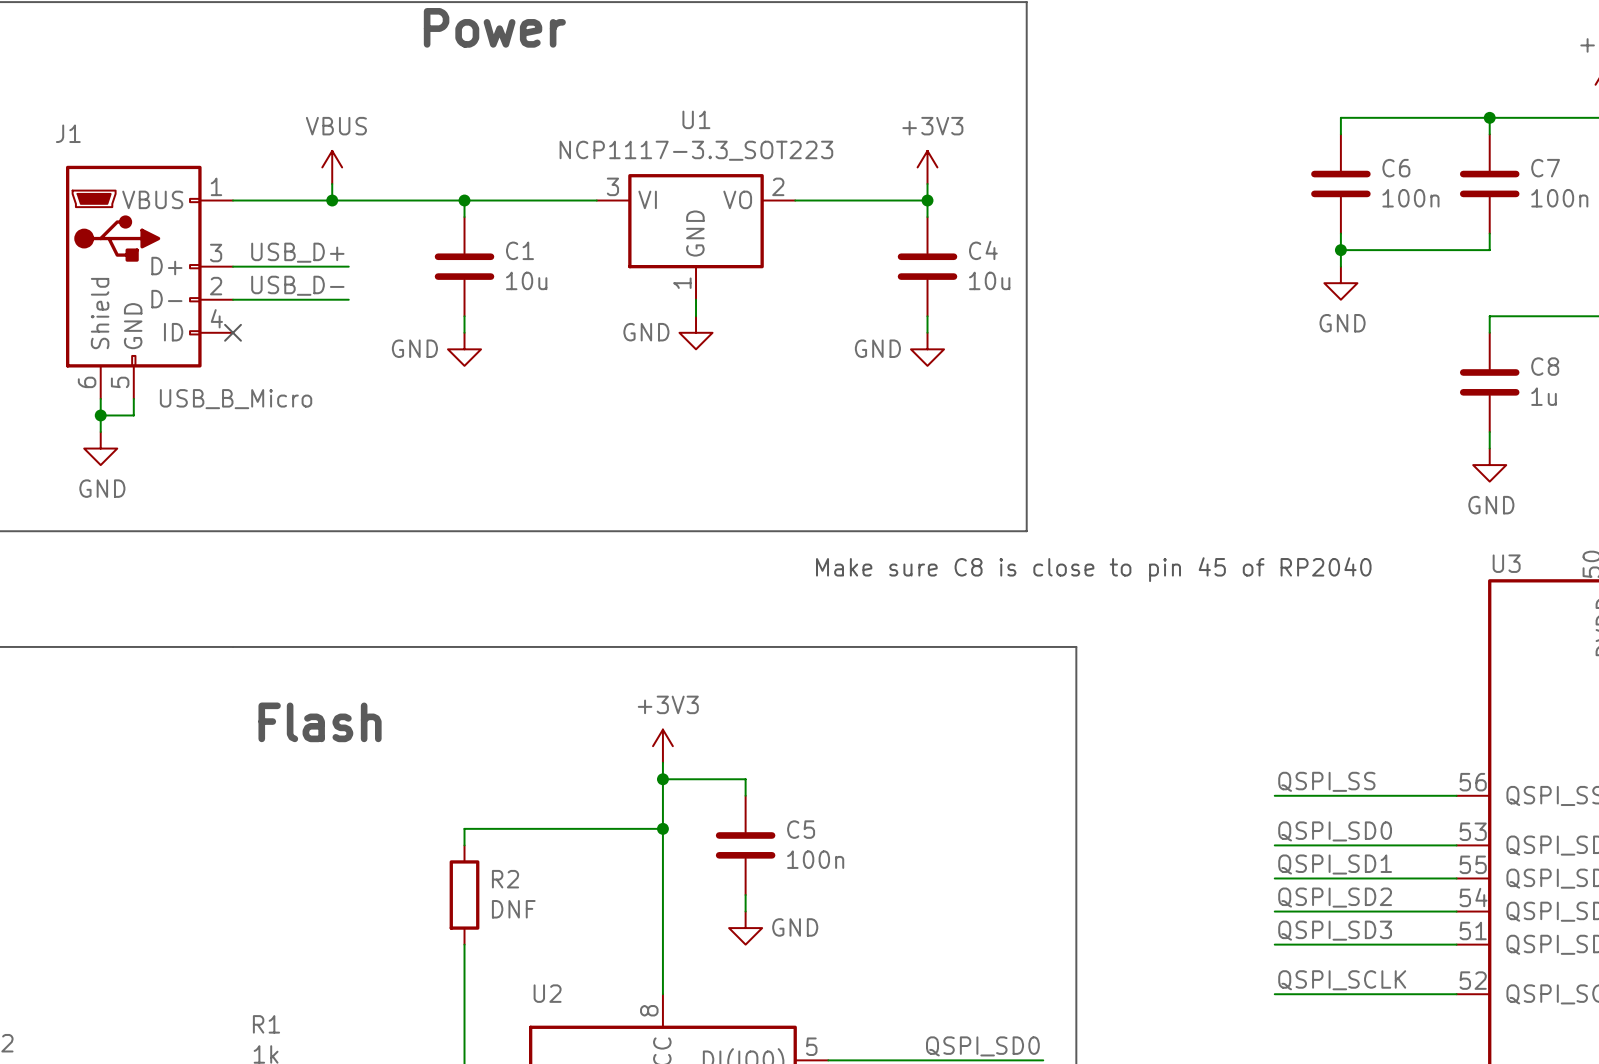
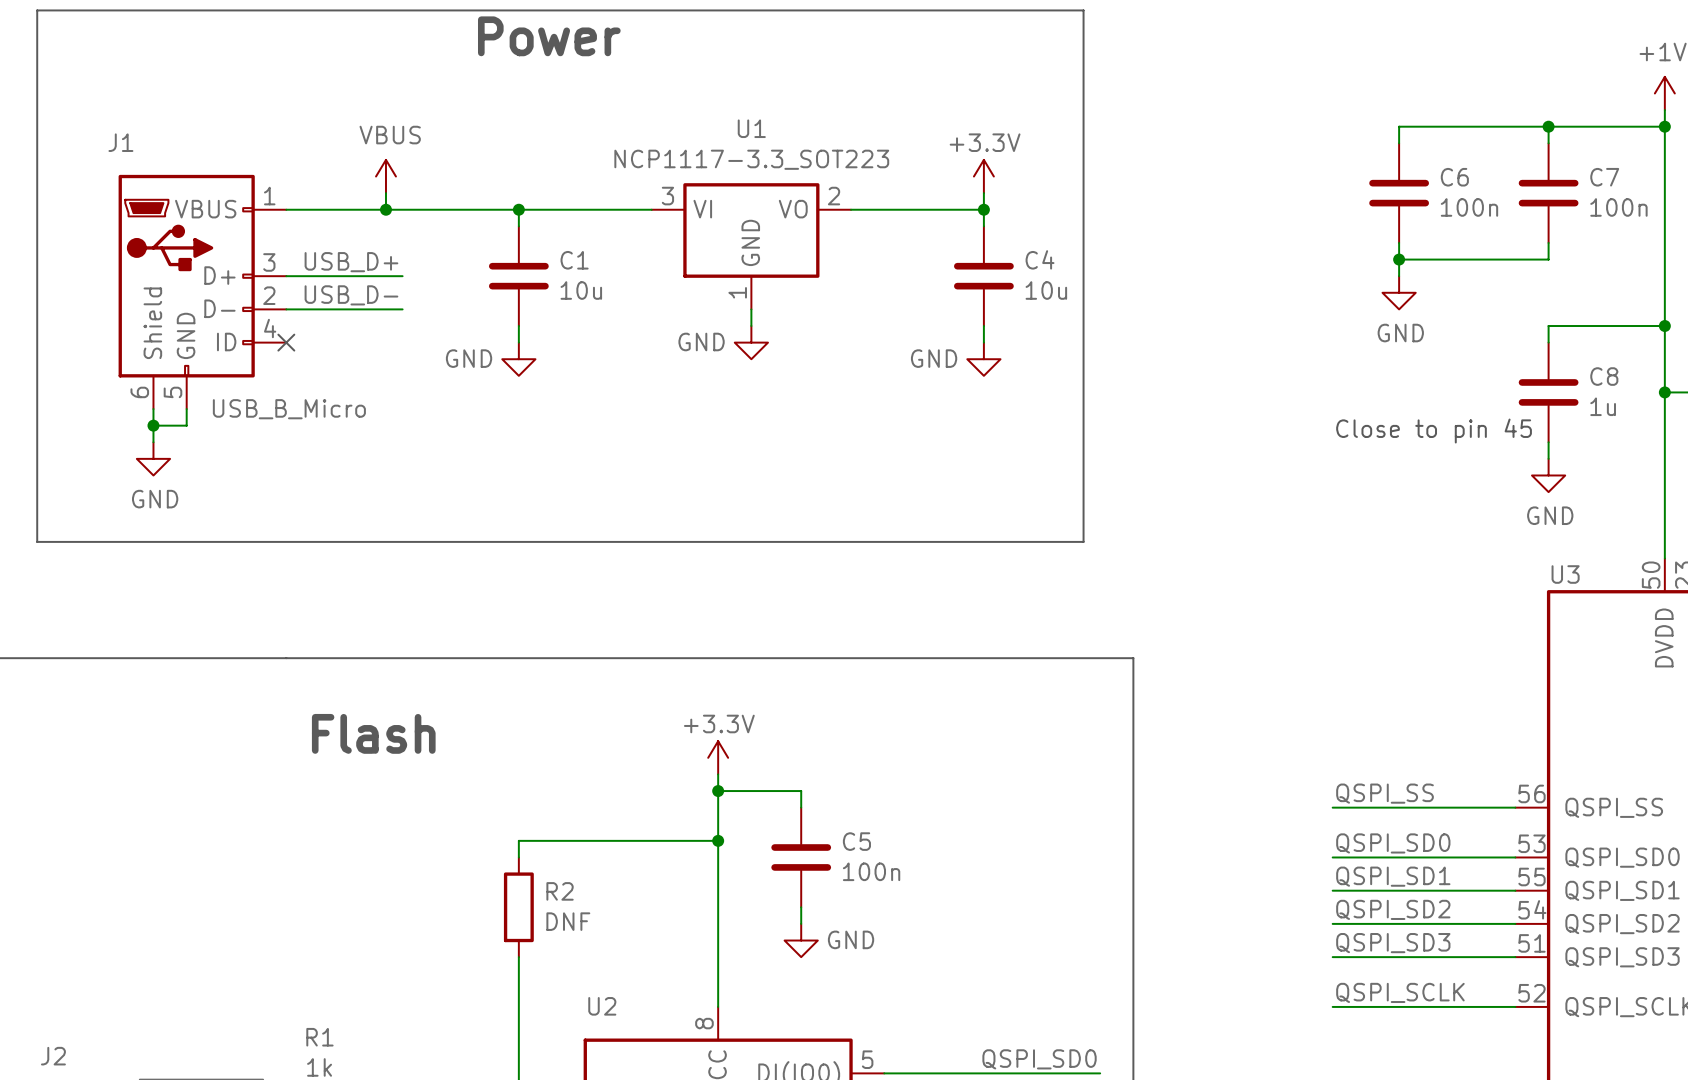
power symbol: +3V3 (927, 167) -> +3.3V (983, 176)
text: none -> Close to pin 45 (1434, 431)
text: Make sure C8 is close to pin 45 of RP2040 (1093, 569) -> none
power symbol: +3V3 (662, 746) -> +3.3V (718, 757)

